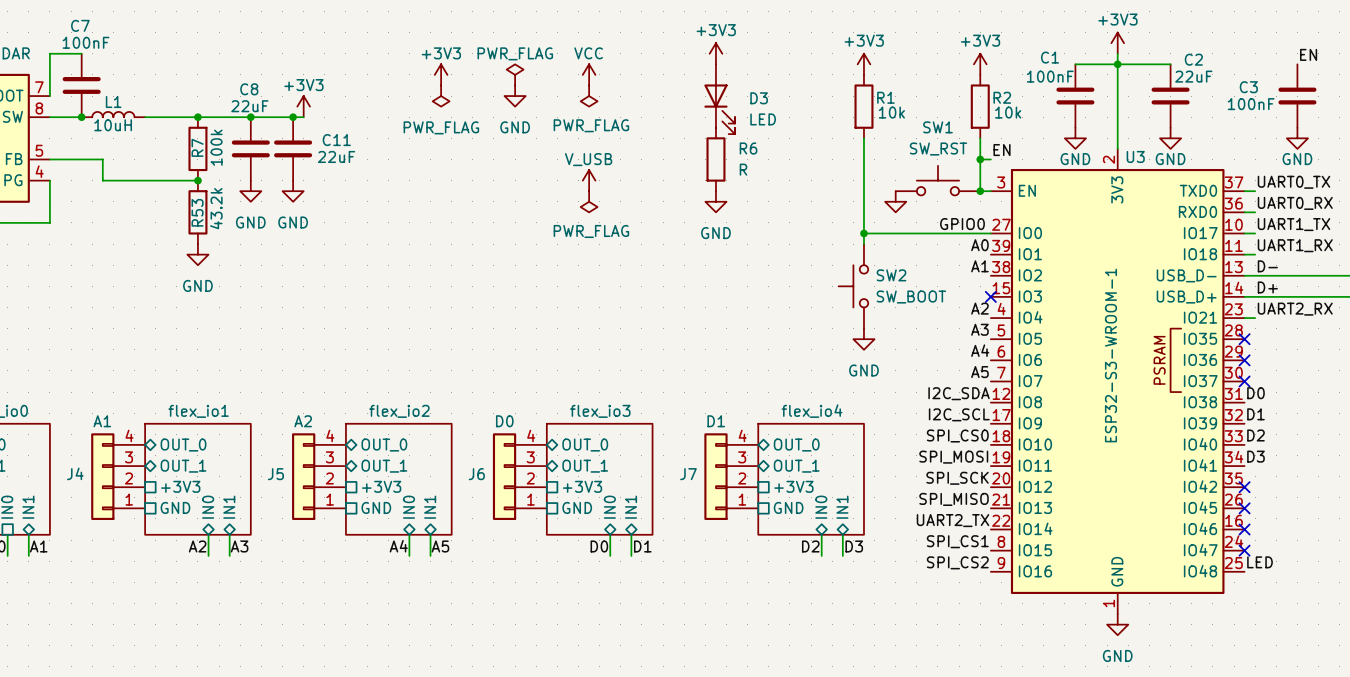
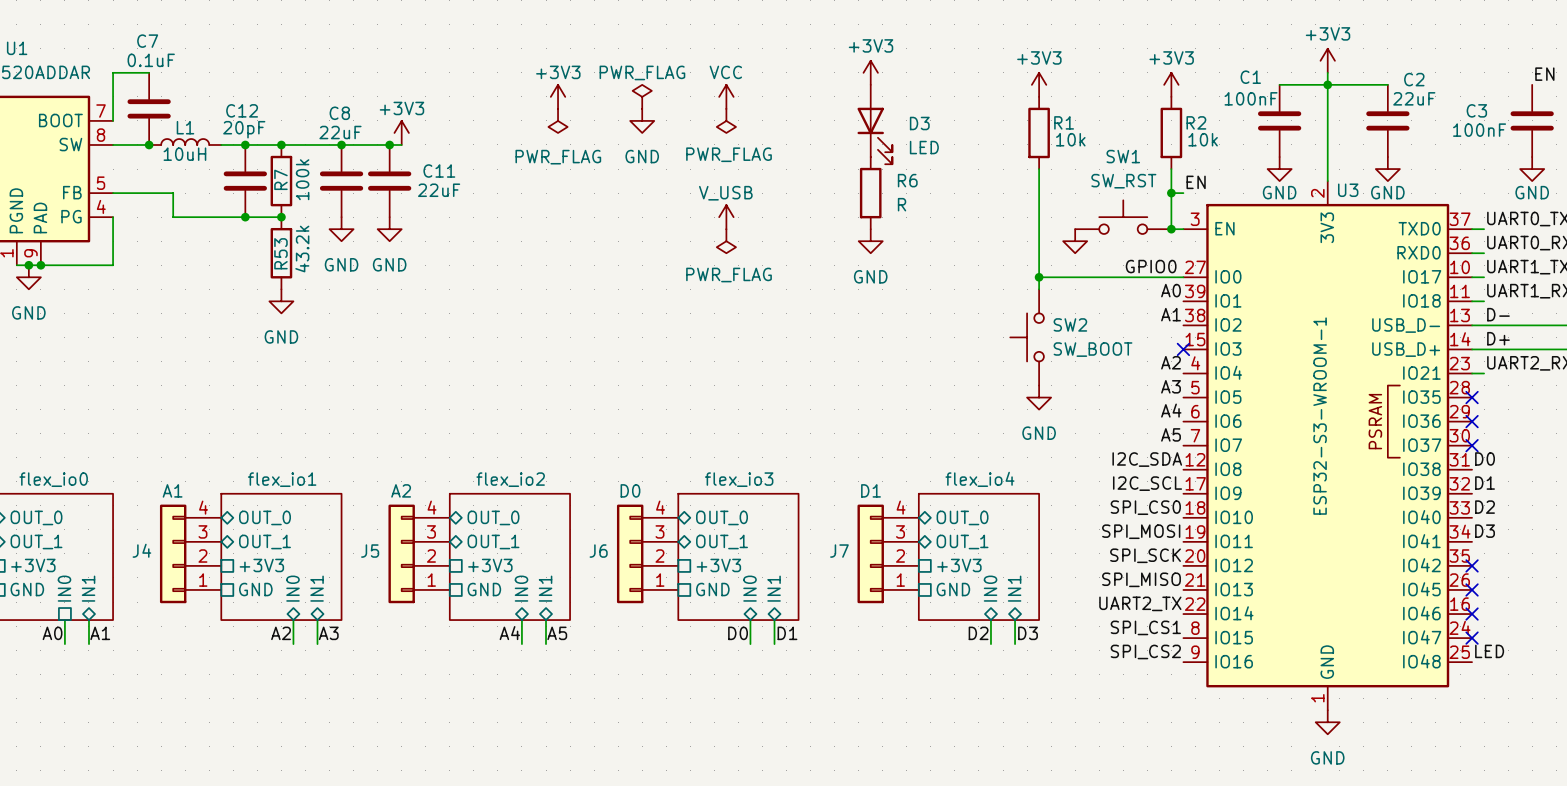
C7 value: 100nF (86, 42) -> 0.1uF (151, 60)
junction: none -> (245, 144)
C12: none -> 20pF (245, 181)
junction: none -> (245, 217)

